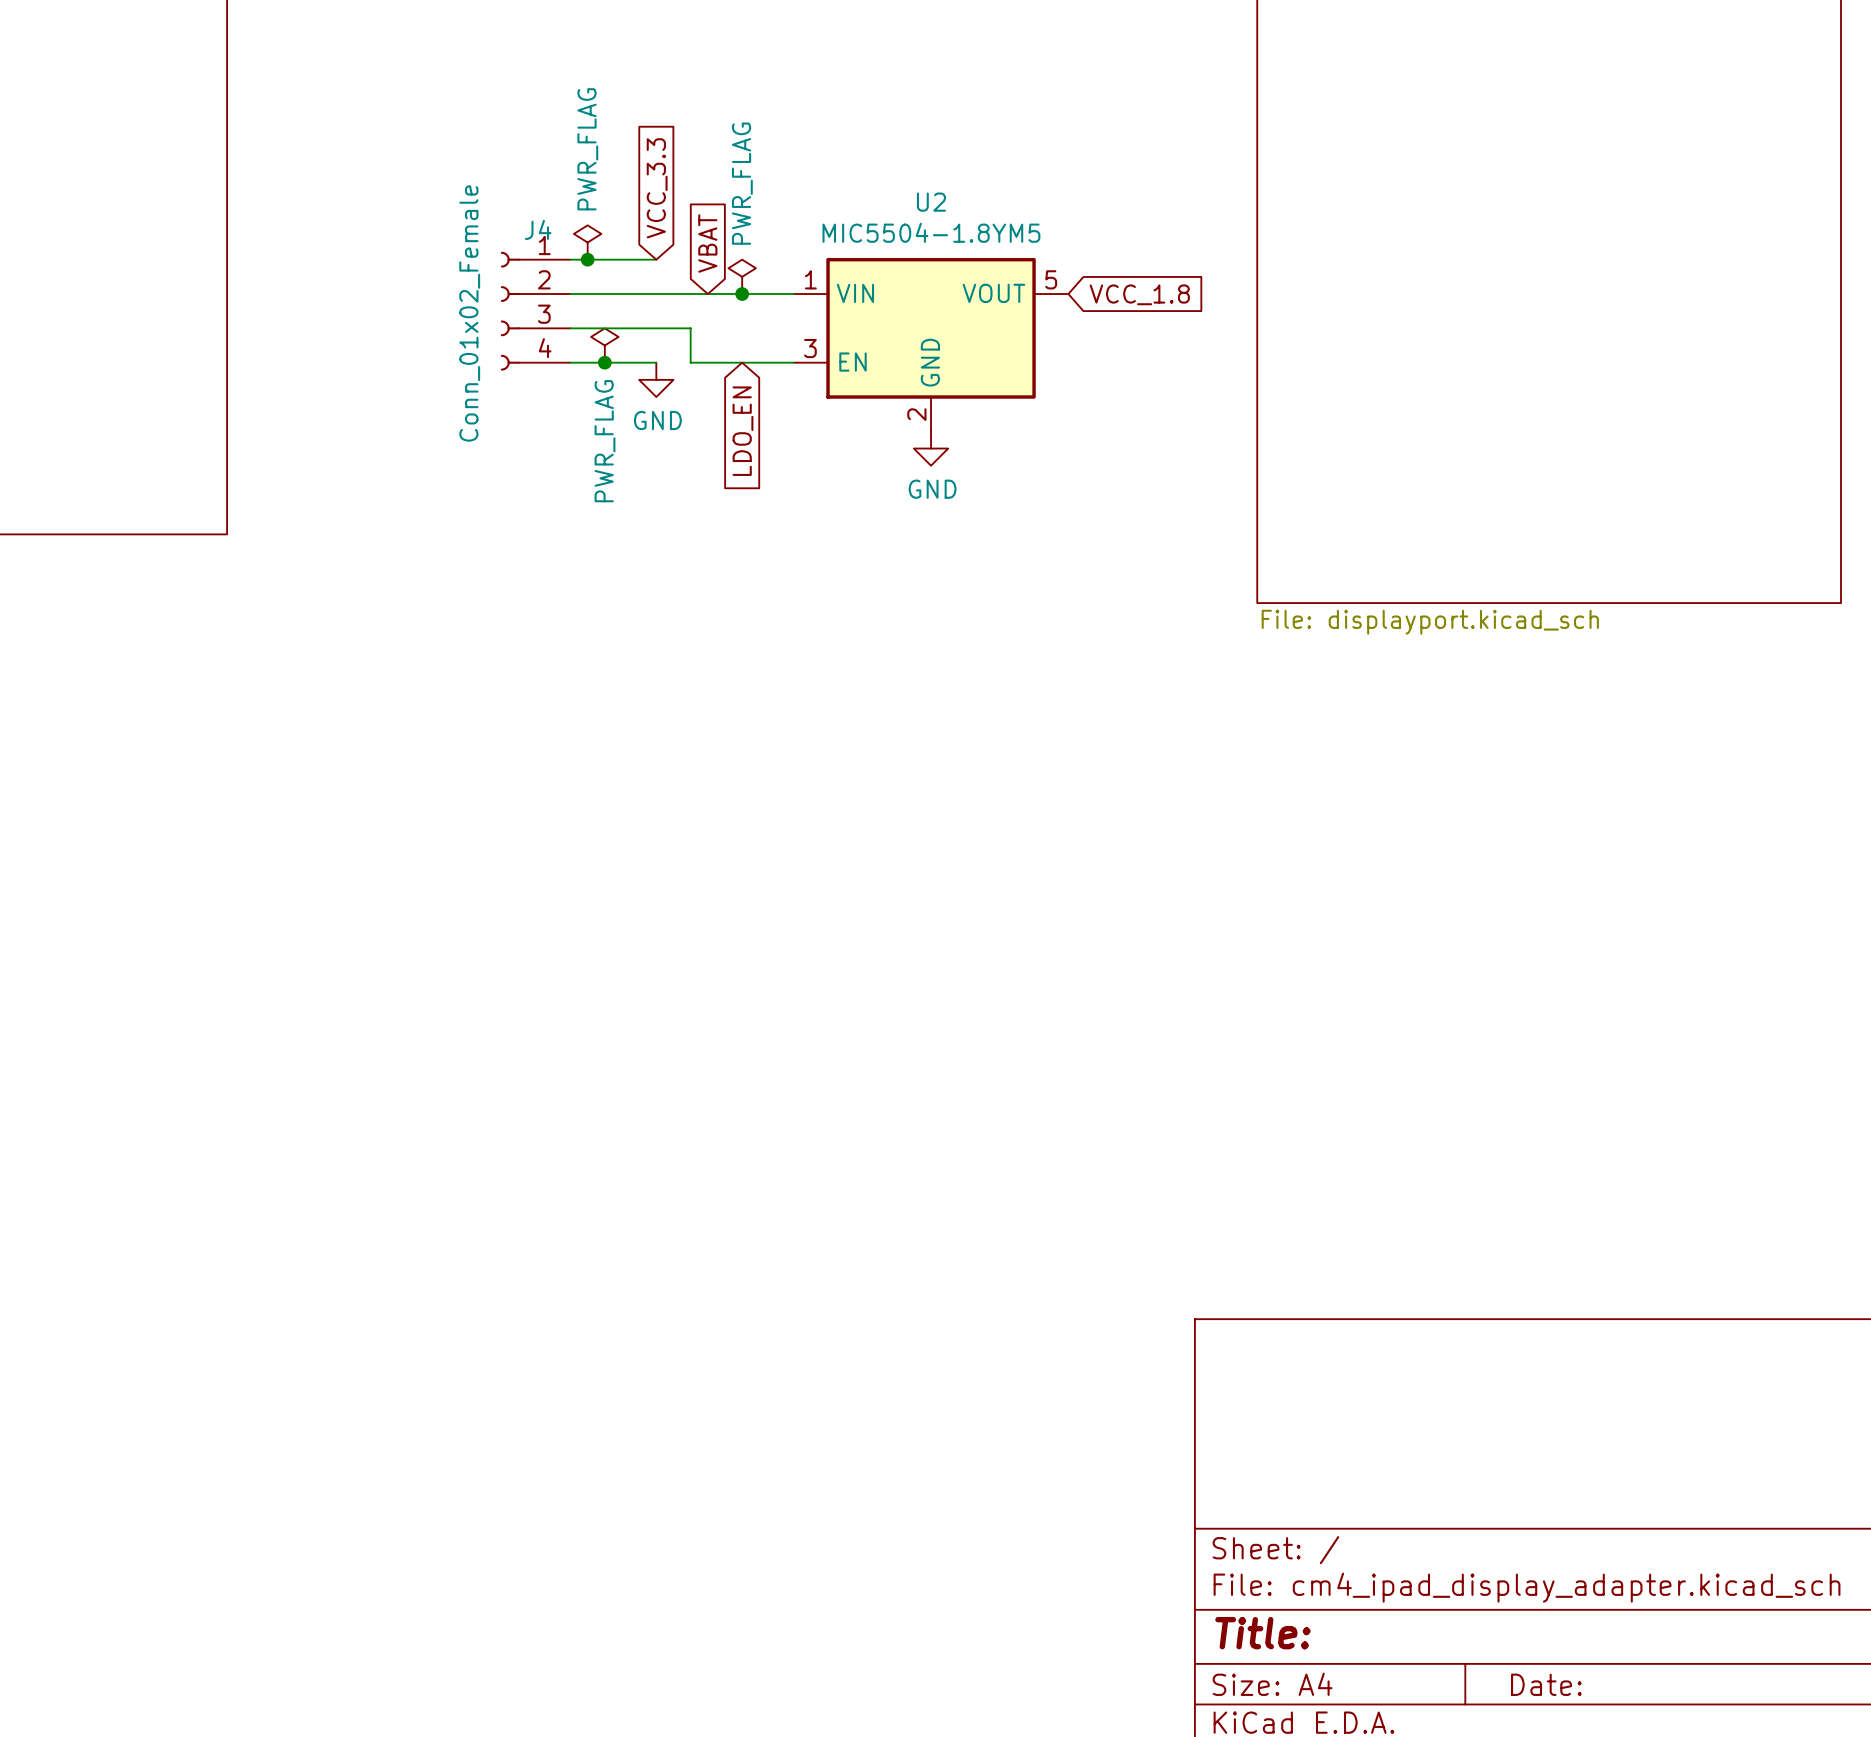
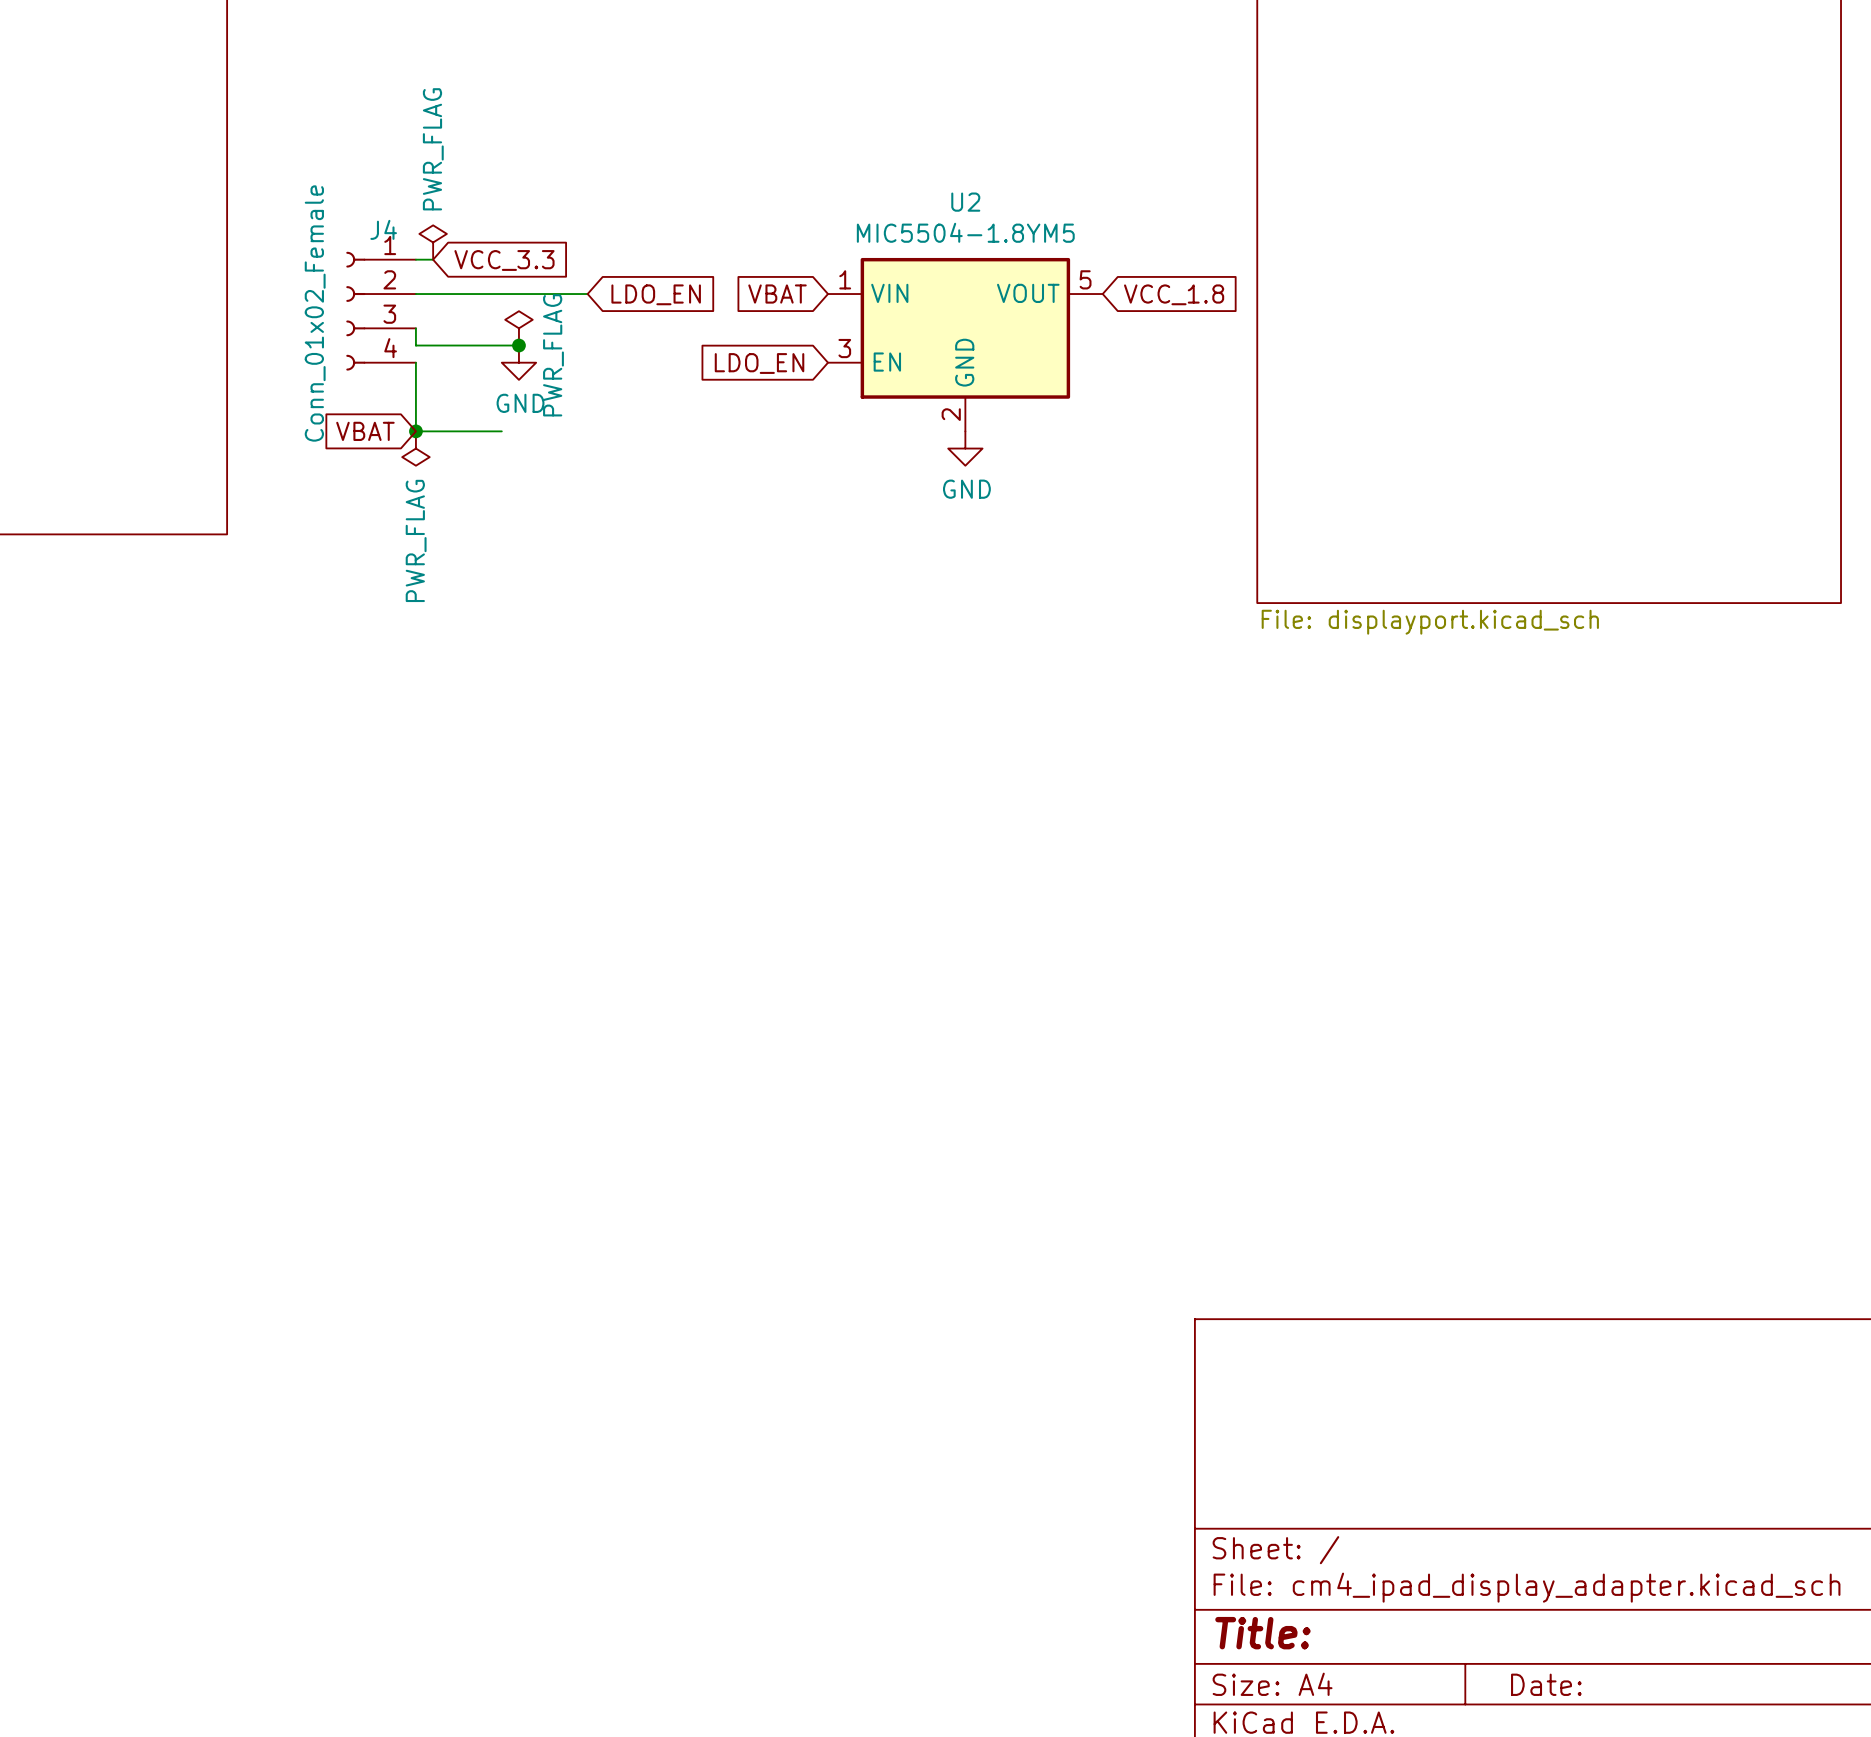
global label rotation: 0° (657, 188) -> 90° clockwise (504, 260)
power symbol: none -> PWR_FLAG (433, 242)
power symbol: PWR_FLAG (587, 242) -> none
global label rotation: 0° (707, 243) -> 90° counterclockwise (777, 294)
wire: none -> (415, 259) (433, 259)
wire: (570, 259) (656, 259) -> none
junction: (587, 259) -> none
power symbol: PWR_FLAG (742, 276) -> none
wire: none -> (415, 294) (570, 294)
wire: (587, 294) (793, 294) -> none
global label: none -> LDO_EN (656, 294)
junction: (742, 294) -> none
global label position: VCC_1.8 (1139, 294) -> VCC_1.8 (1174, 294)
J4 position: (535, 311) -> (381, 311)
wire: none -> (415, 328) (415, 345) (518, 345)
power symbol: none -> PWR_FLAG (518, 328)
wire: (570, 328) (690, 328) (690, 362) (793, 362) -> none
U2 position: (931, 344) -> (965, 344)
junction: none -> (518, 345)
power symbol: PWR_FLAG (604, 345) -> none
wire: none -> (415, 362) (415, 431) (501, 431)
wire: (570, 362) (656, 362) -> none
junction: (604, 362) -> none
power symbol position: GND (656, 379) -> GND (518, 362)
global label: none -> VBAT (365, 431)
junction: none -> (415, 431)
global label rotation: 0° (742, 431) -> 90° clockwise (759, 363)
power symbol: none -> PWR_FLAG (415, 448)
power symbol position: GND (931, 448) -> GND (965, 448)

